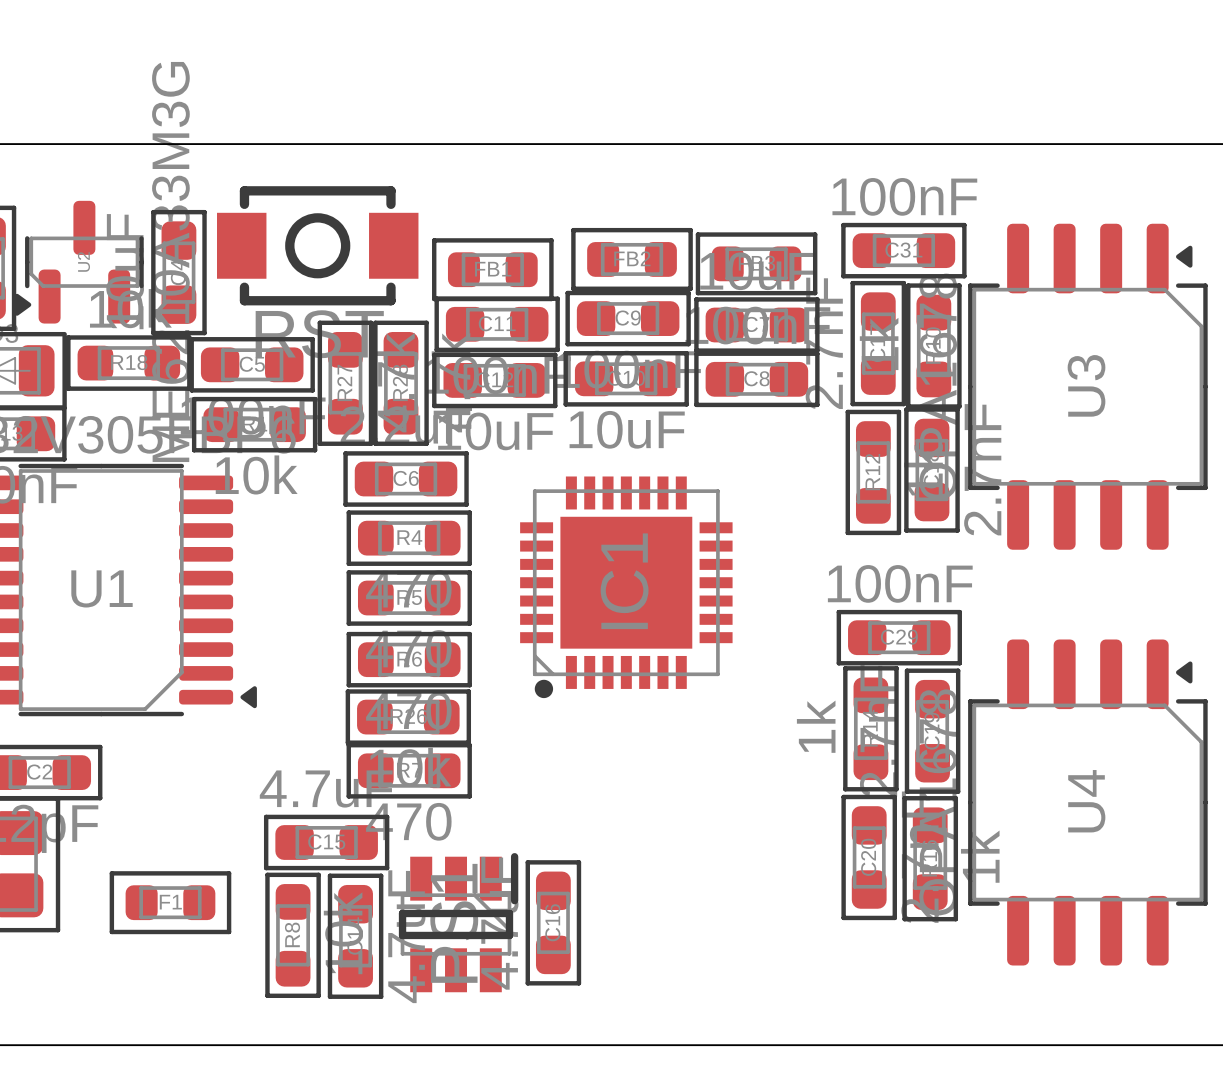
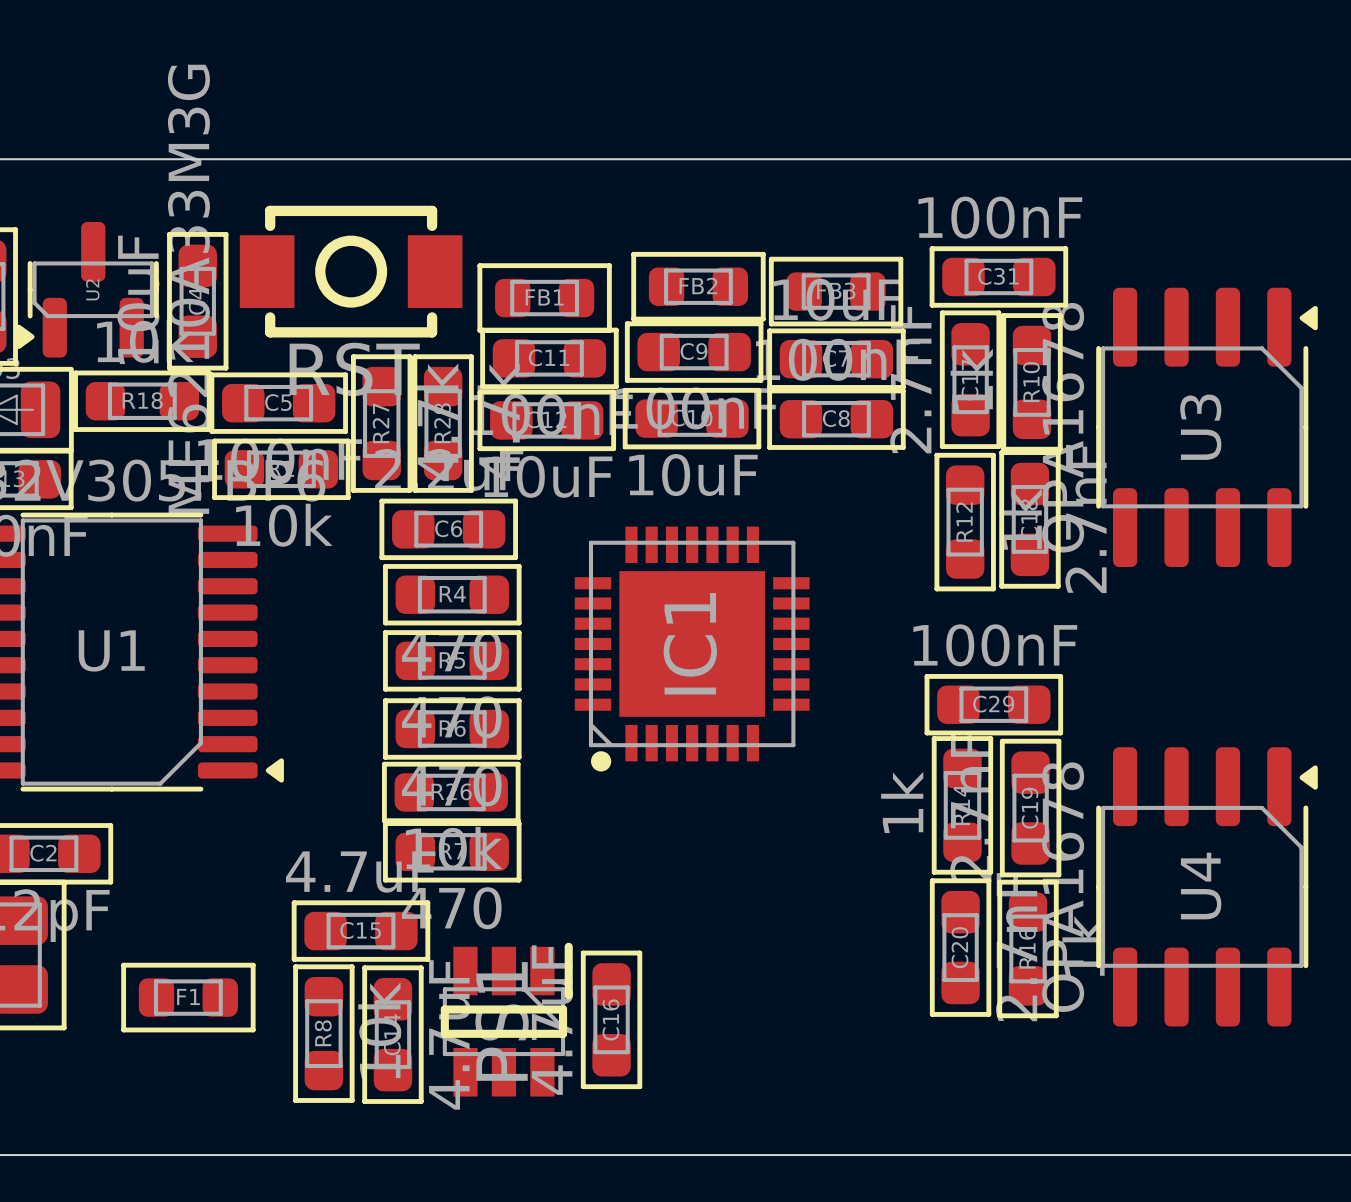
U3 footprint: [968, 223, 1208, 550] -> [1096, 287, 1318, 568]
U4 footprint: [968, 639, 1208, 966] -> [1096, 747, 1318, 1027]

